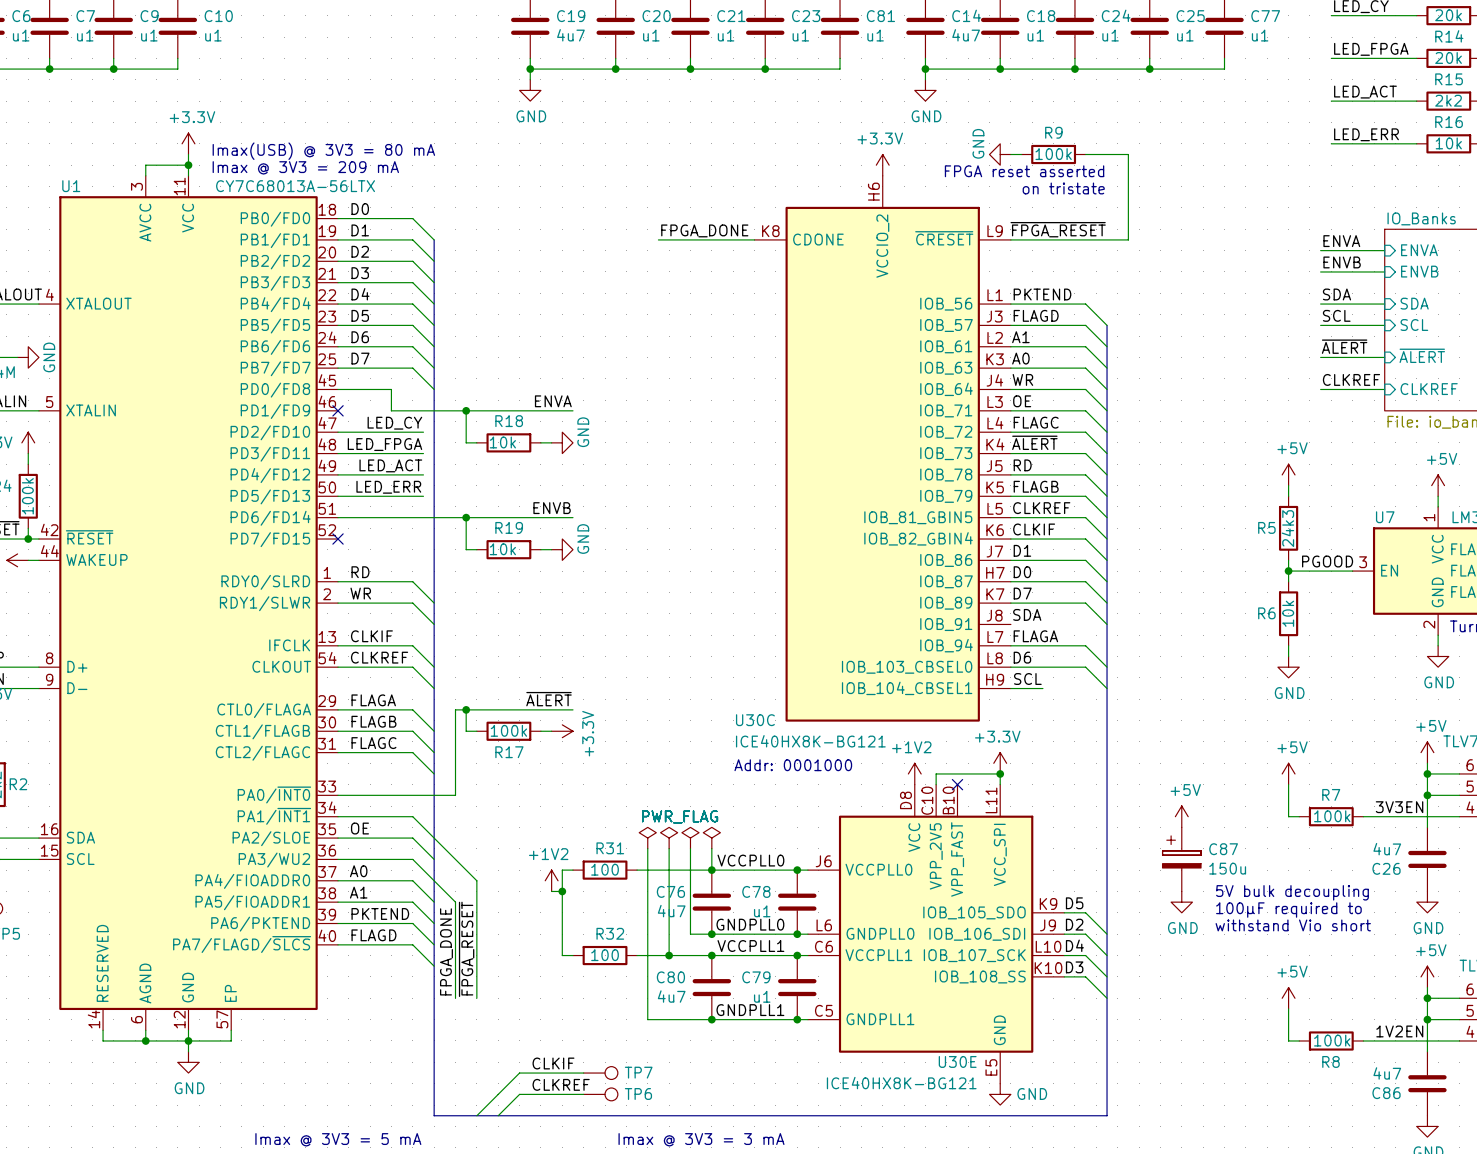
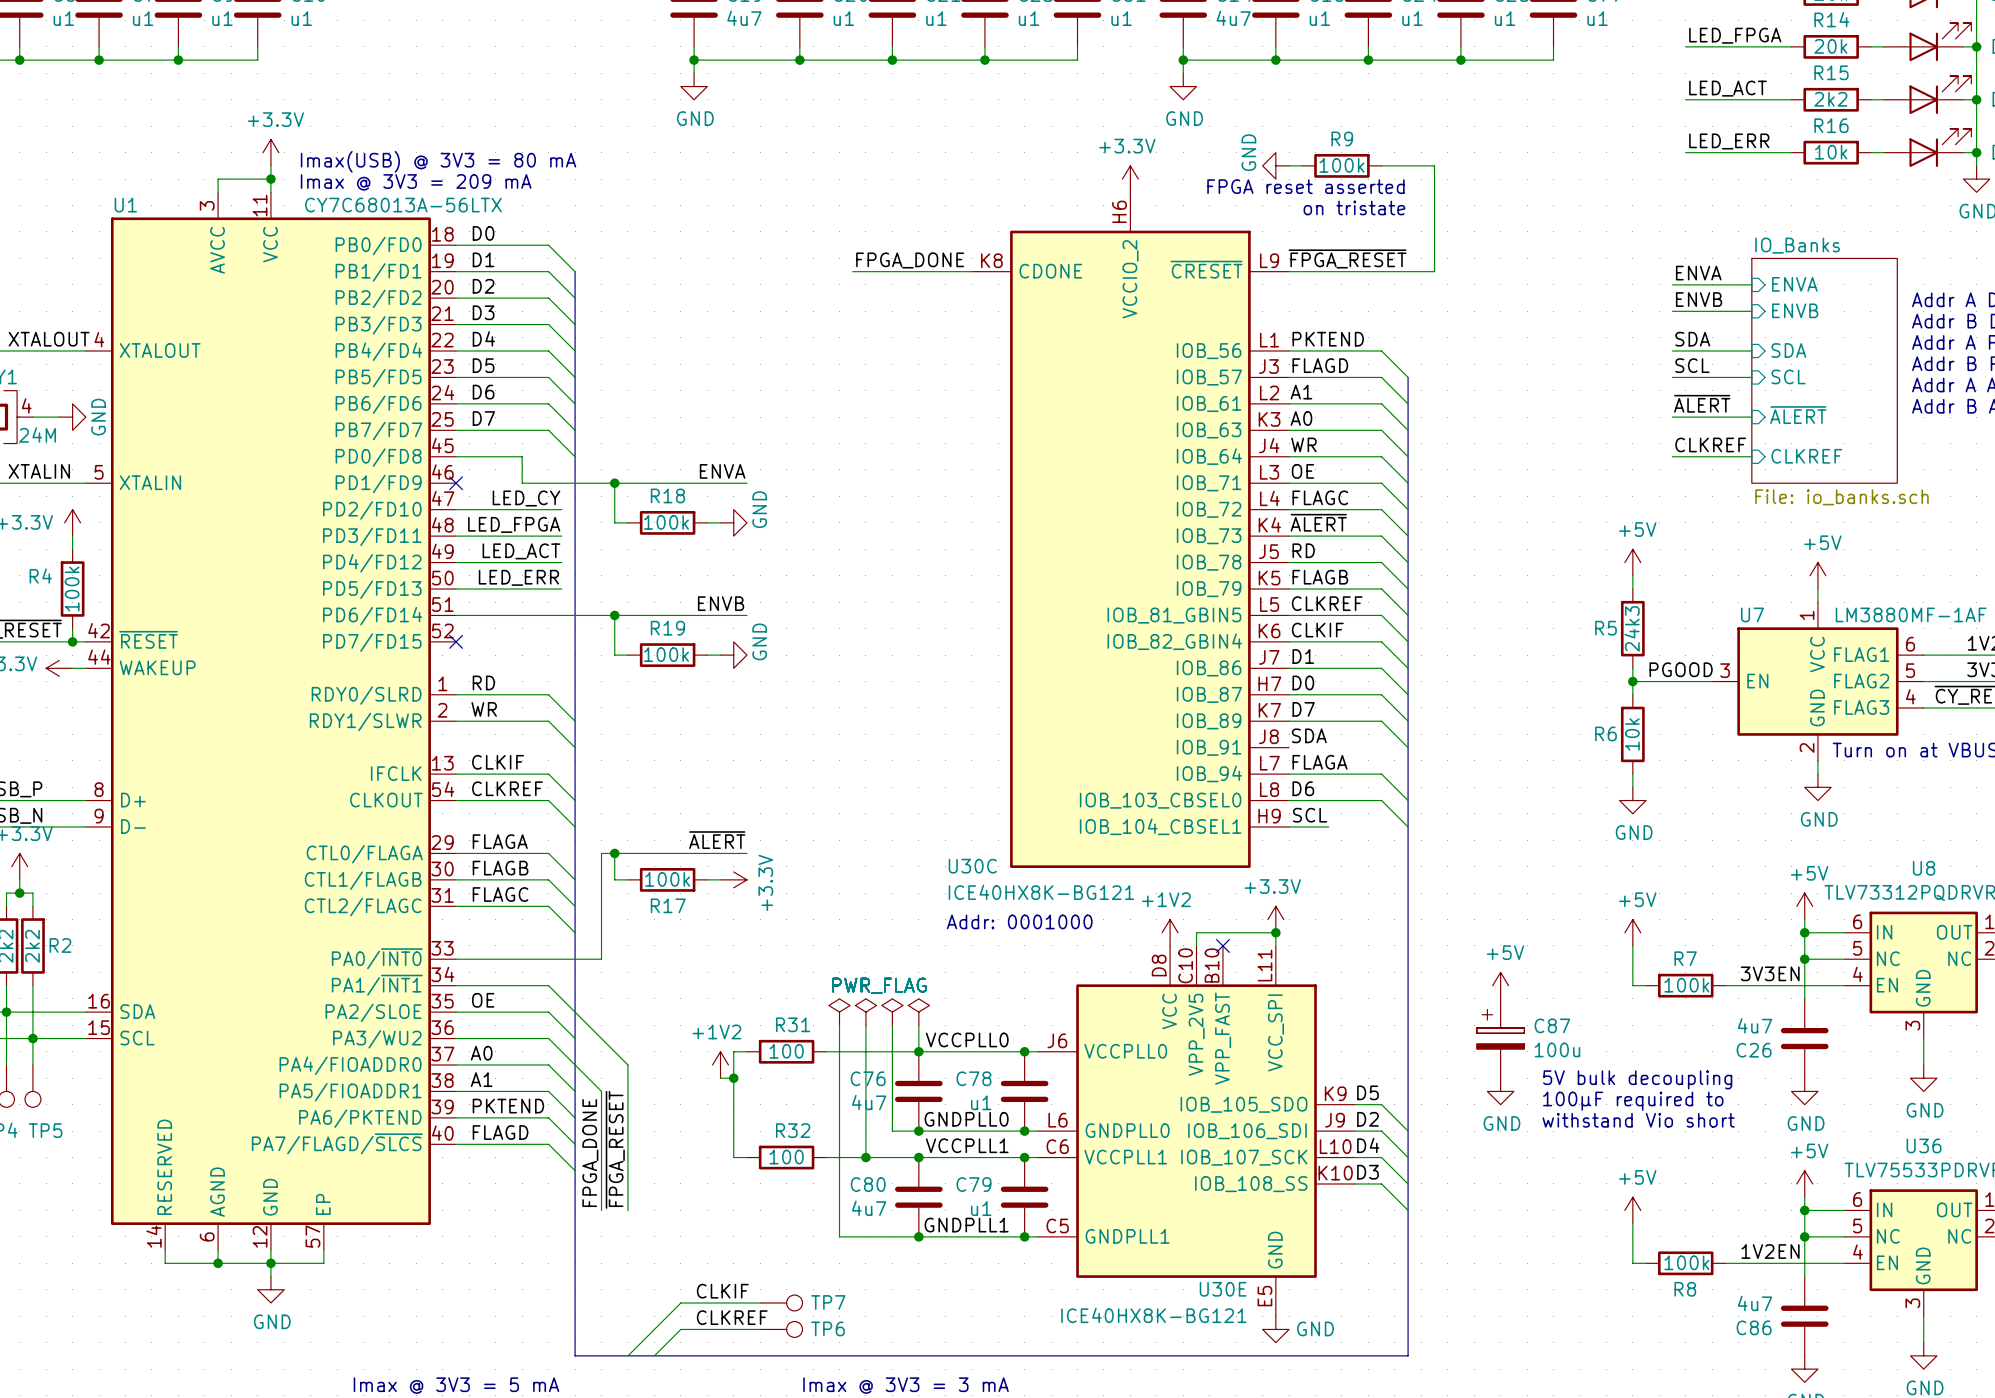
R18 value: 10k (502, 442) -> 100k (666, 522)
R19 value: 10k (502, 549) -> 100k (666, 654)
C87 value: 150u (1227, 868) -> 100u (1557, 1049)

